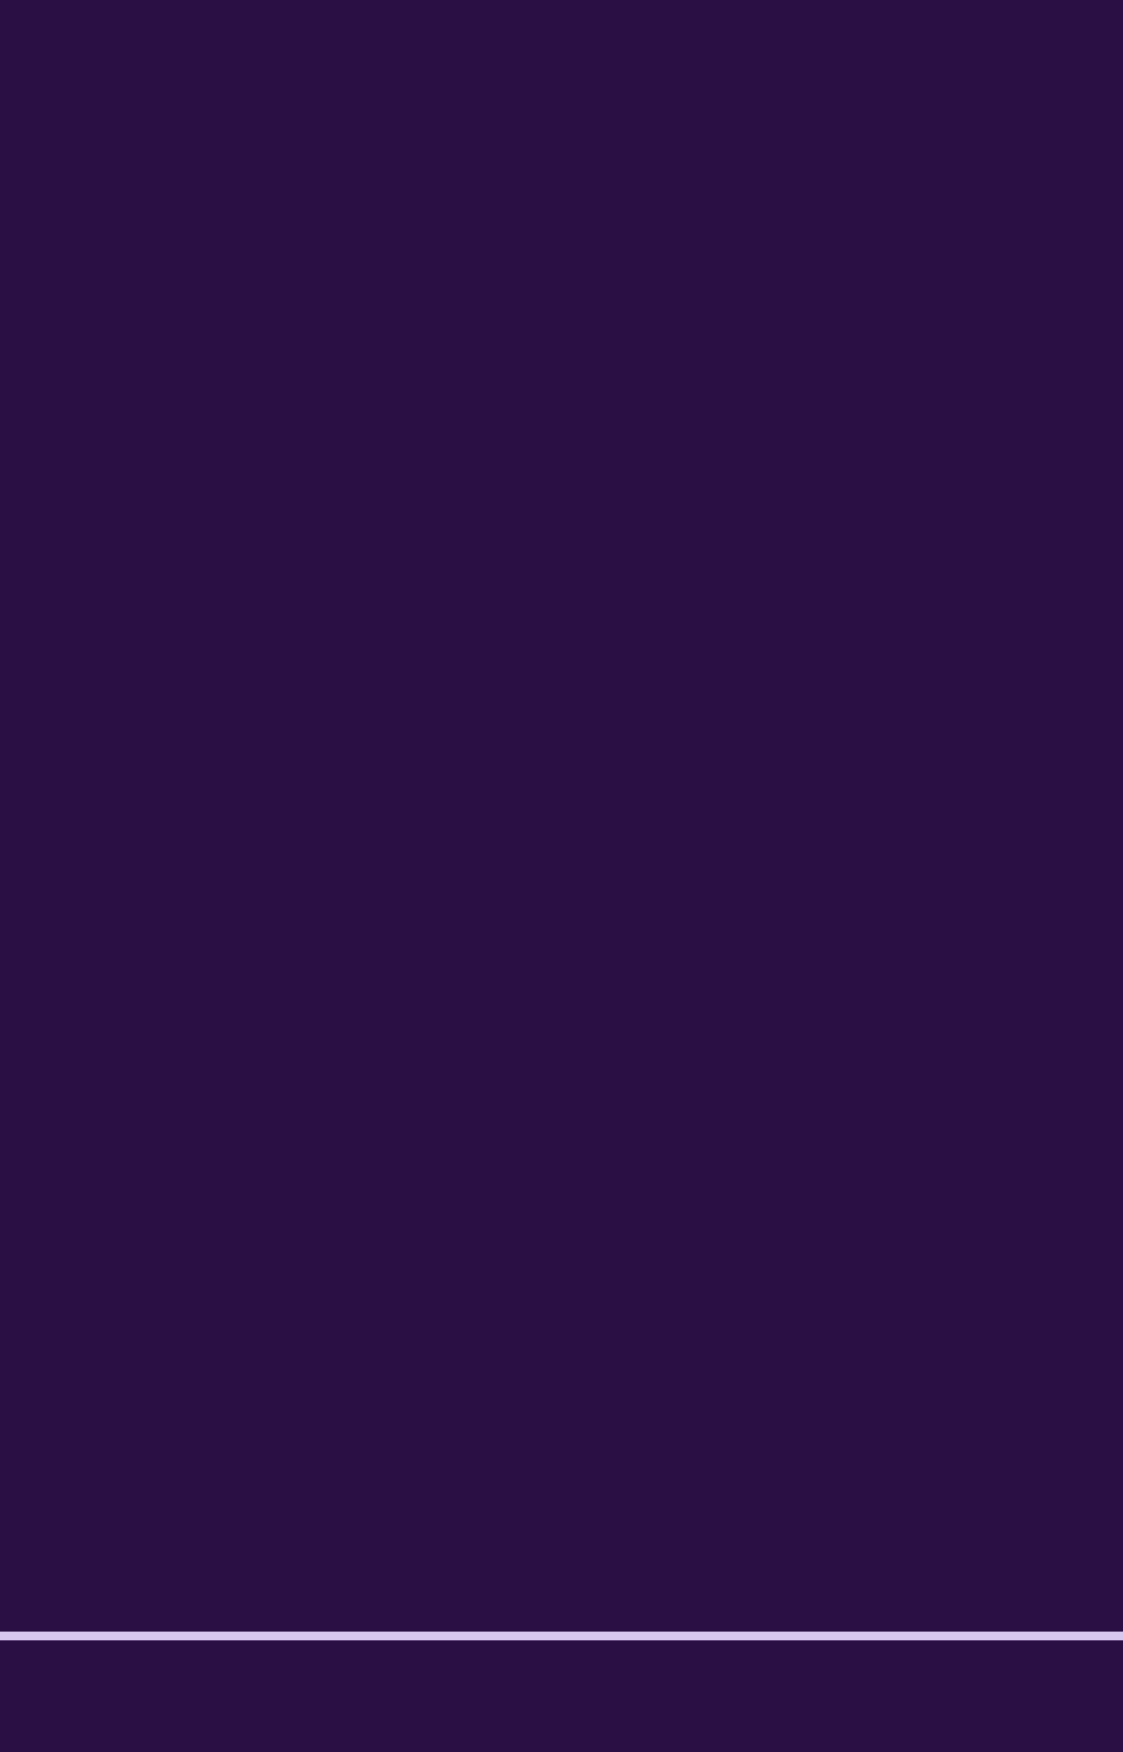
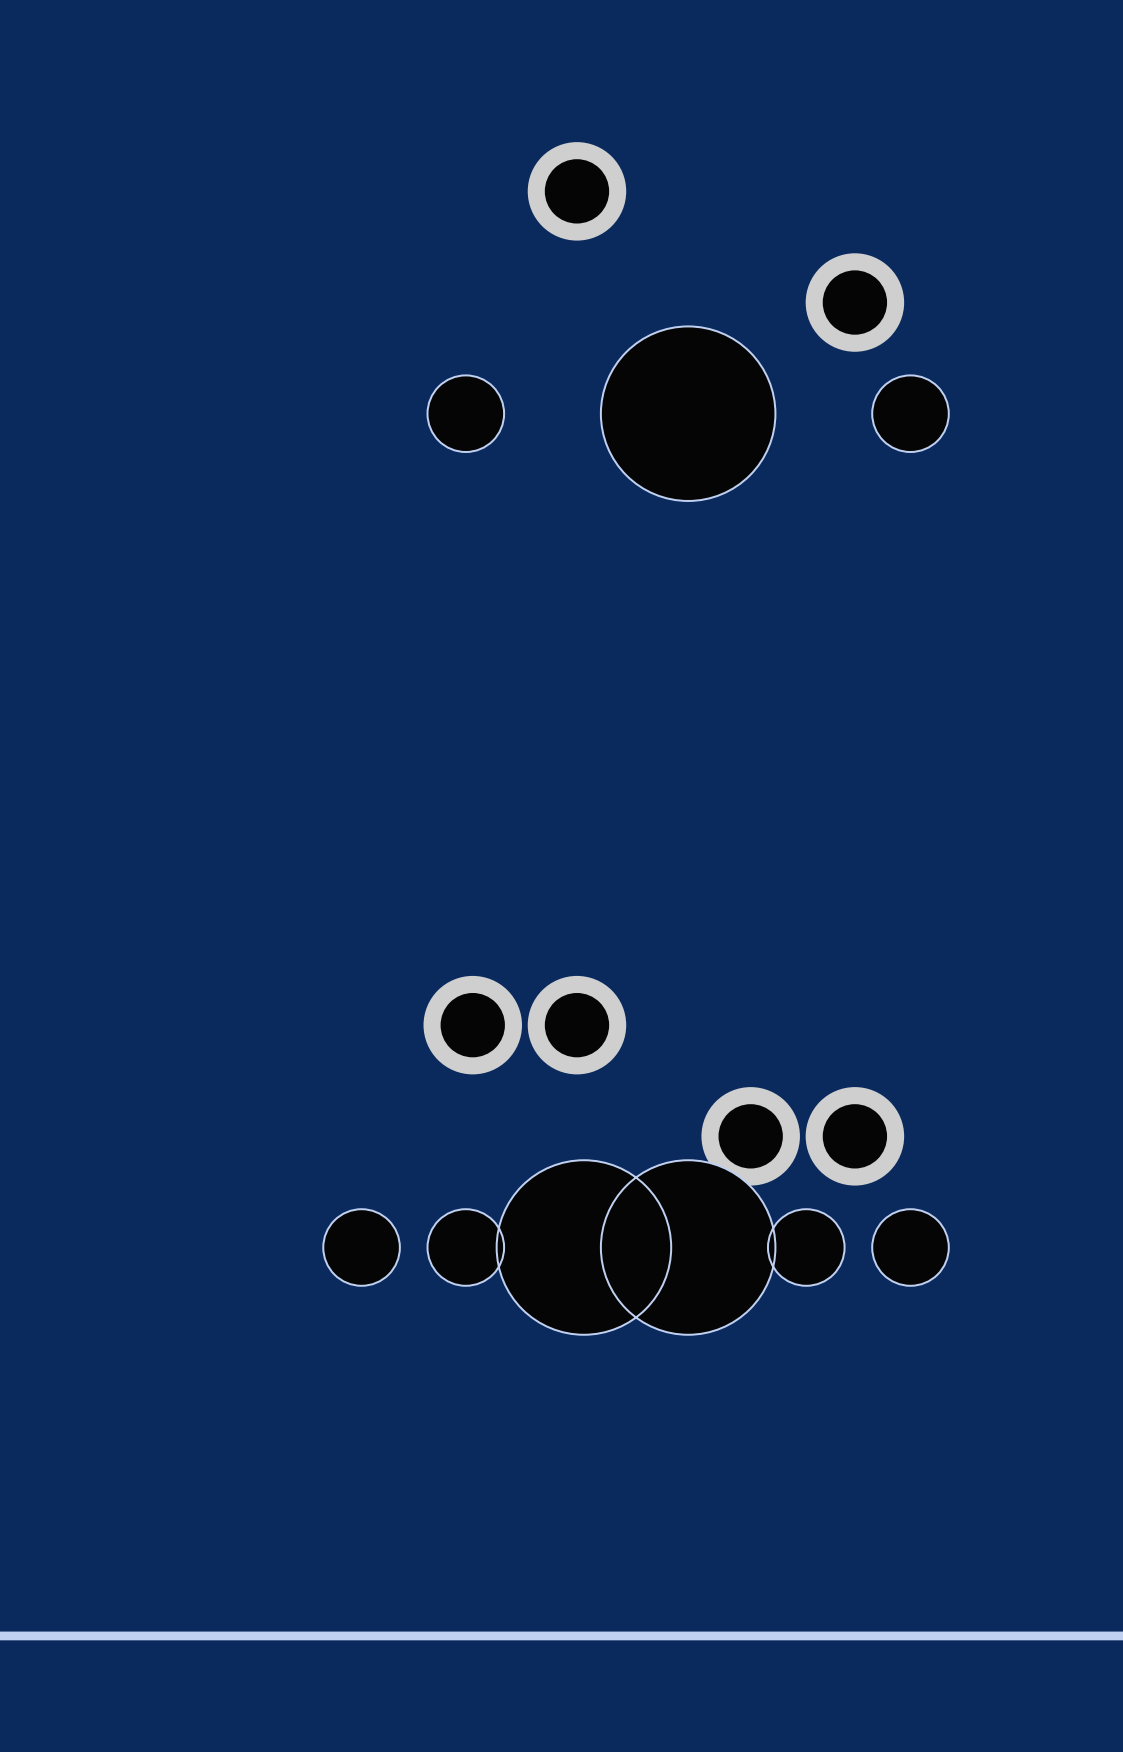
part: none -> (688, 321)
part: none -> (583, 1155)
part: none -> (688, 1155)

